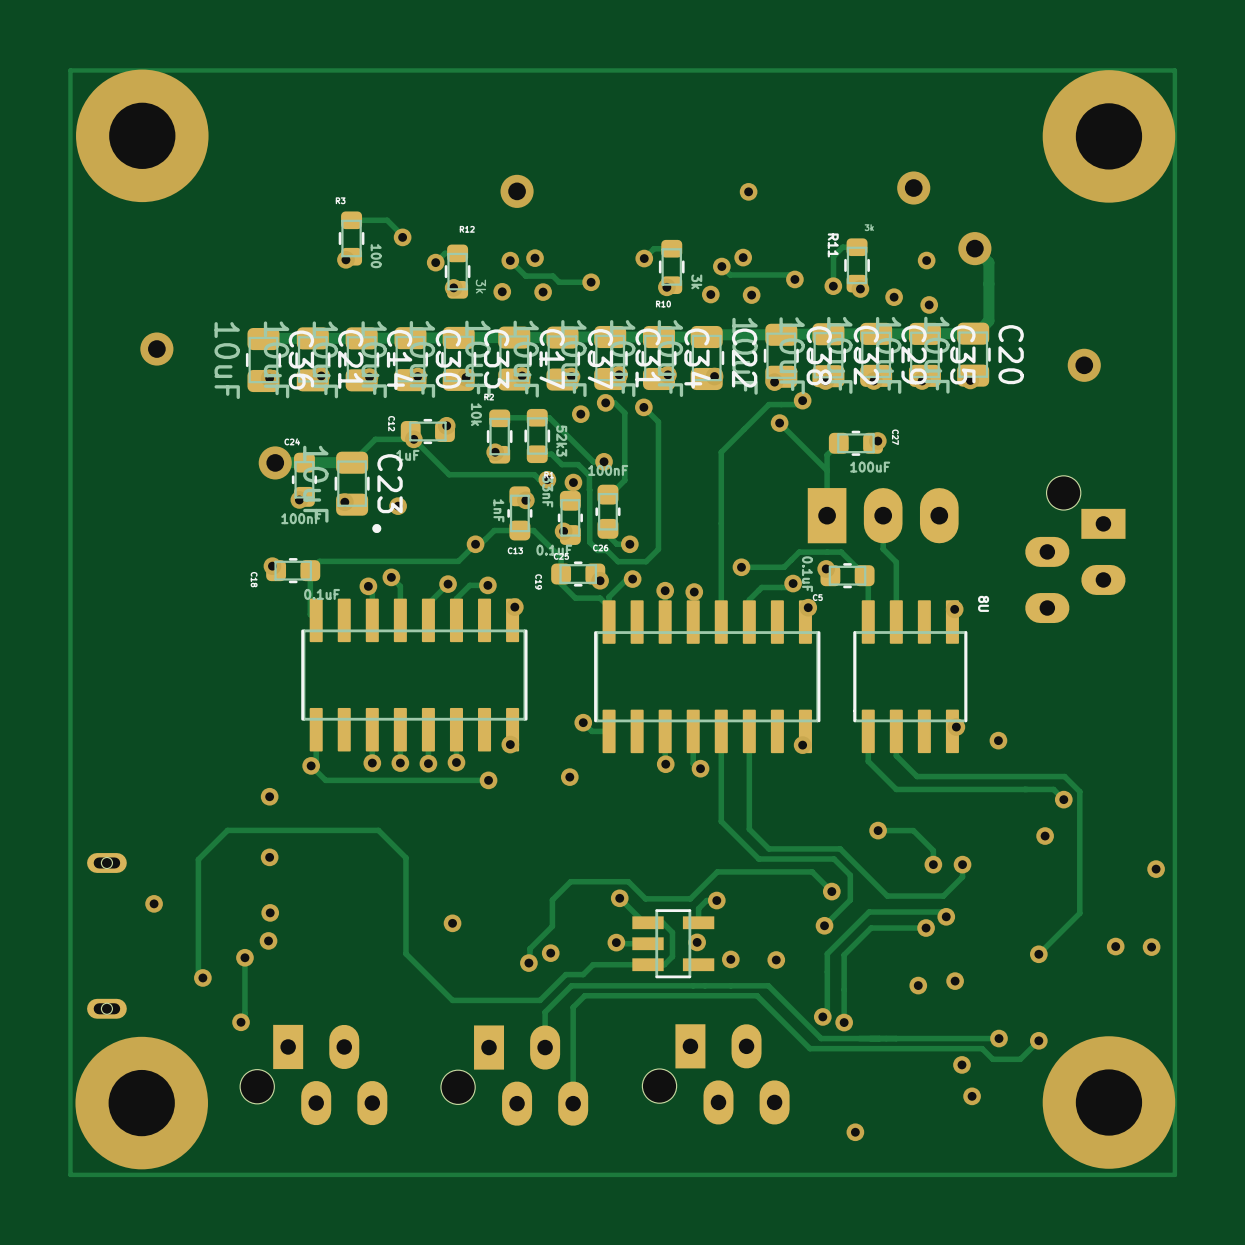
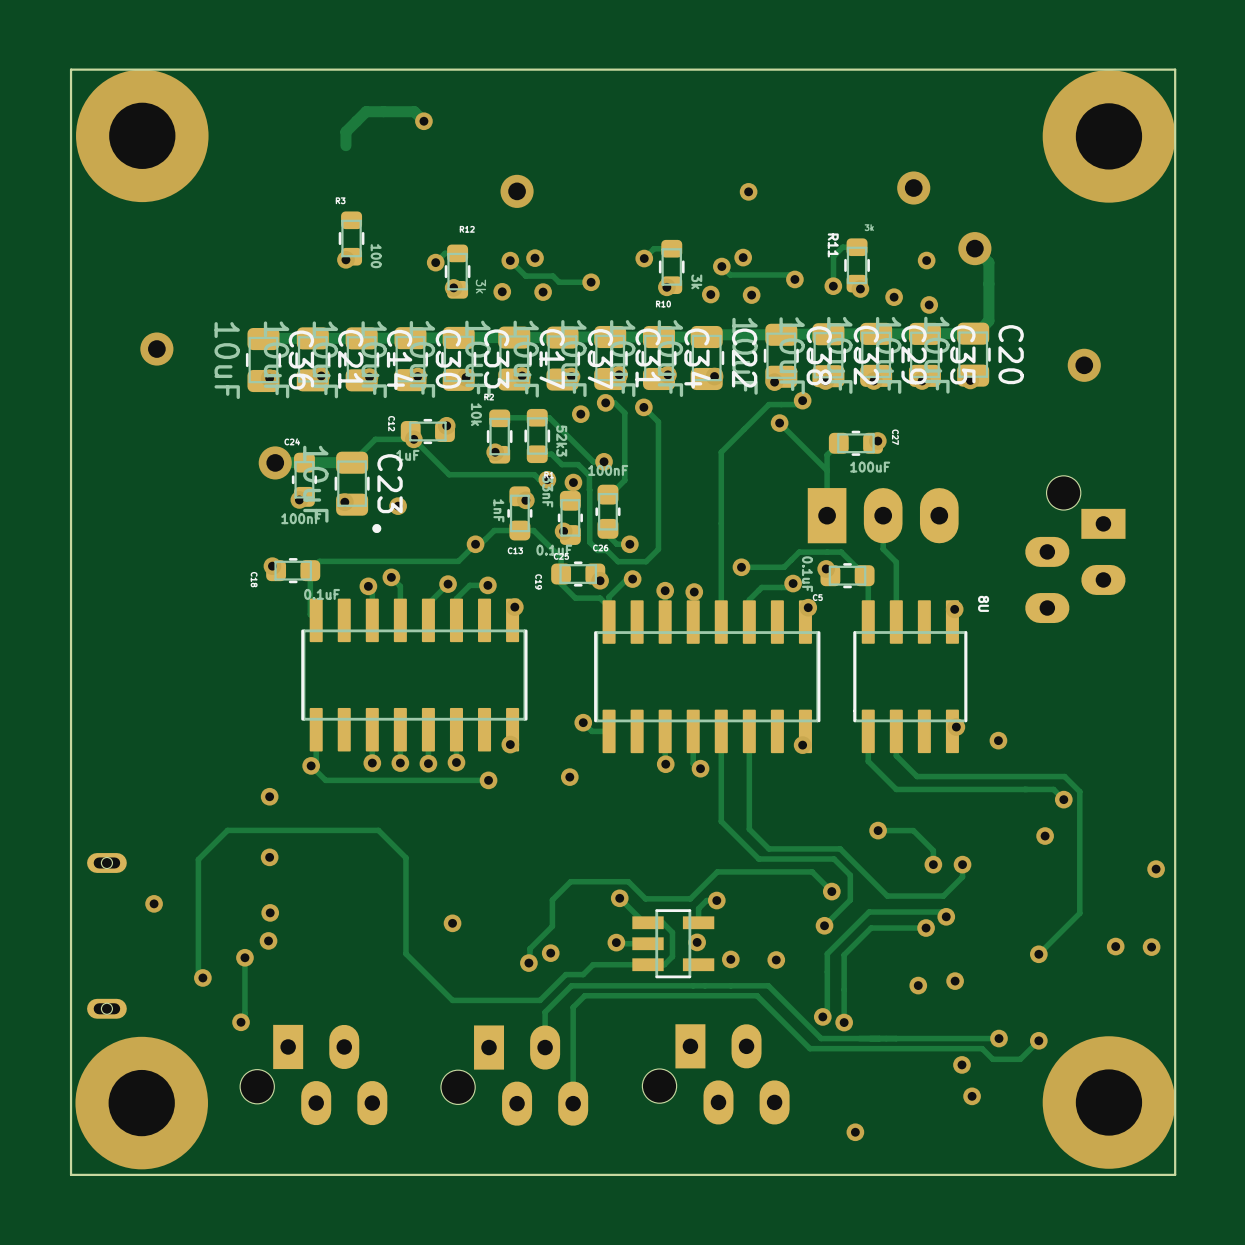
board edge: none -> (1175, 69) (71, 69) (71, 1174) (1175, 1174) (1175, 69)
track: (1174, 70) (70, 70) (70, 1174) (1174, 1174) (1174, 70) -> none
track: none -> (423, 121) (414, 111) (366, 111) (345, 131) (345, 145)
track: (351, 220) (387, 220) (402, 237) -> none
via position: (402, 237) -> (423, 121)

